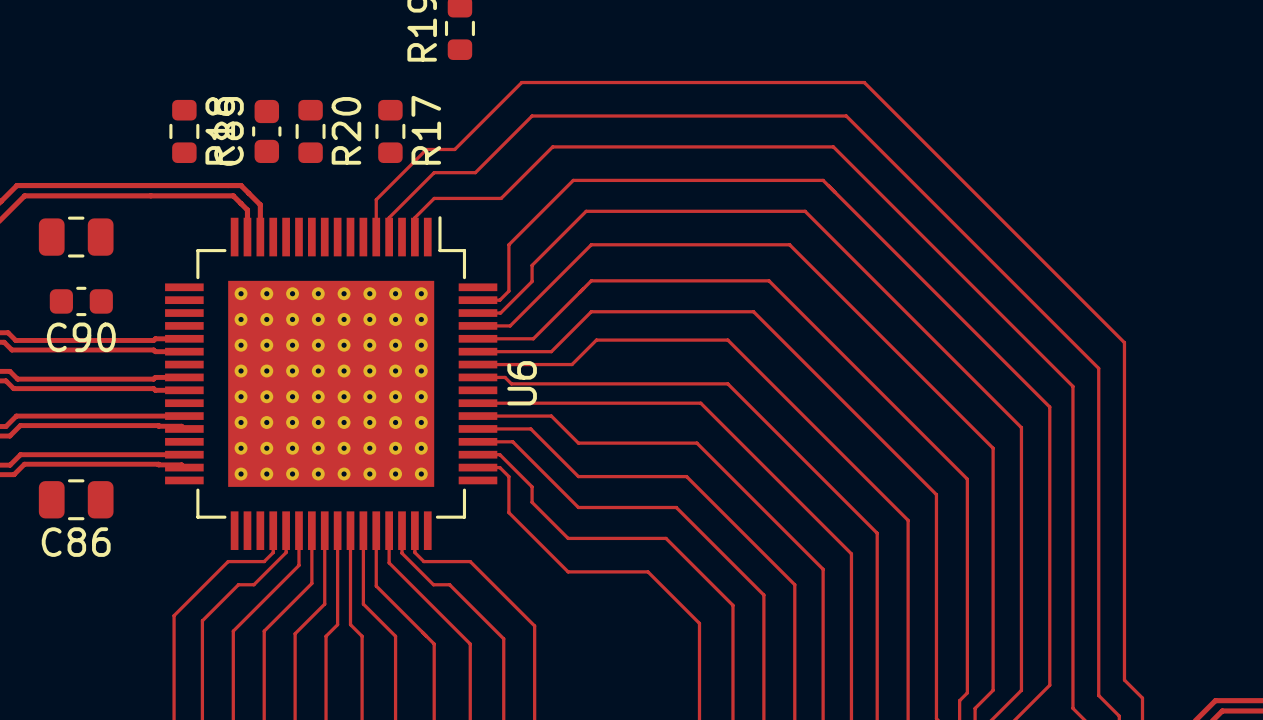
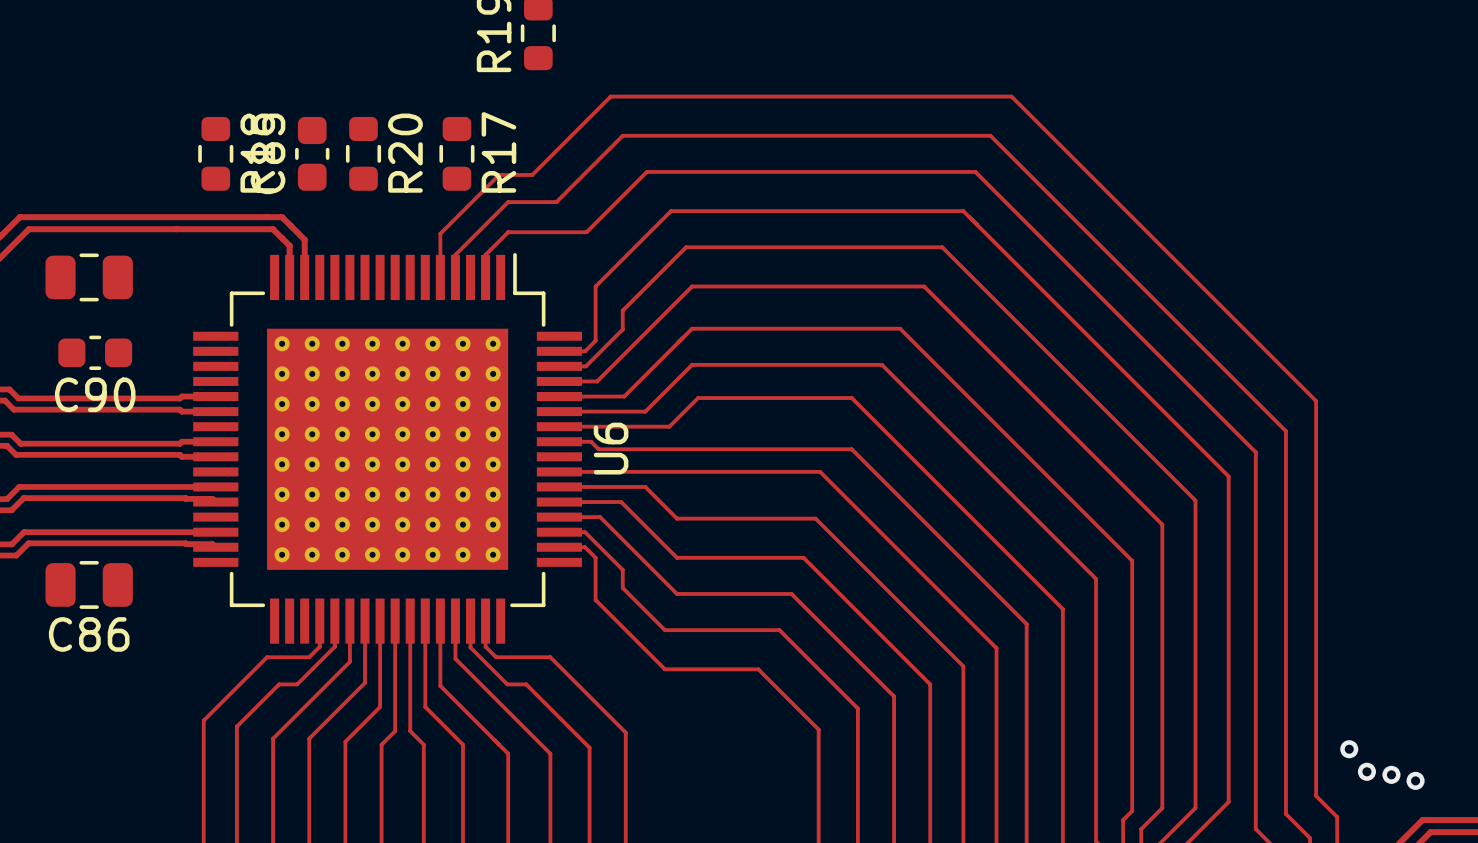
via: none -> (1349, 749)
via: none -> (1366, 771)
via: none -> (1391, 774)
via: none -> (1415, 780)

